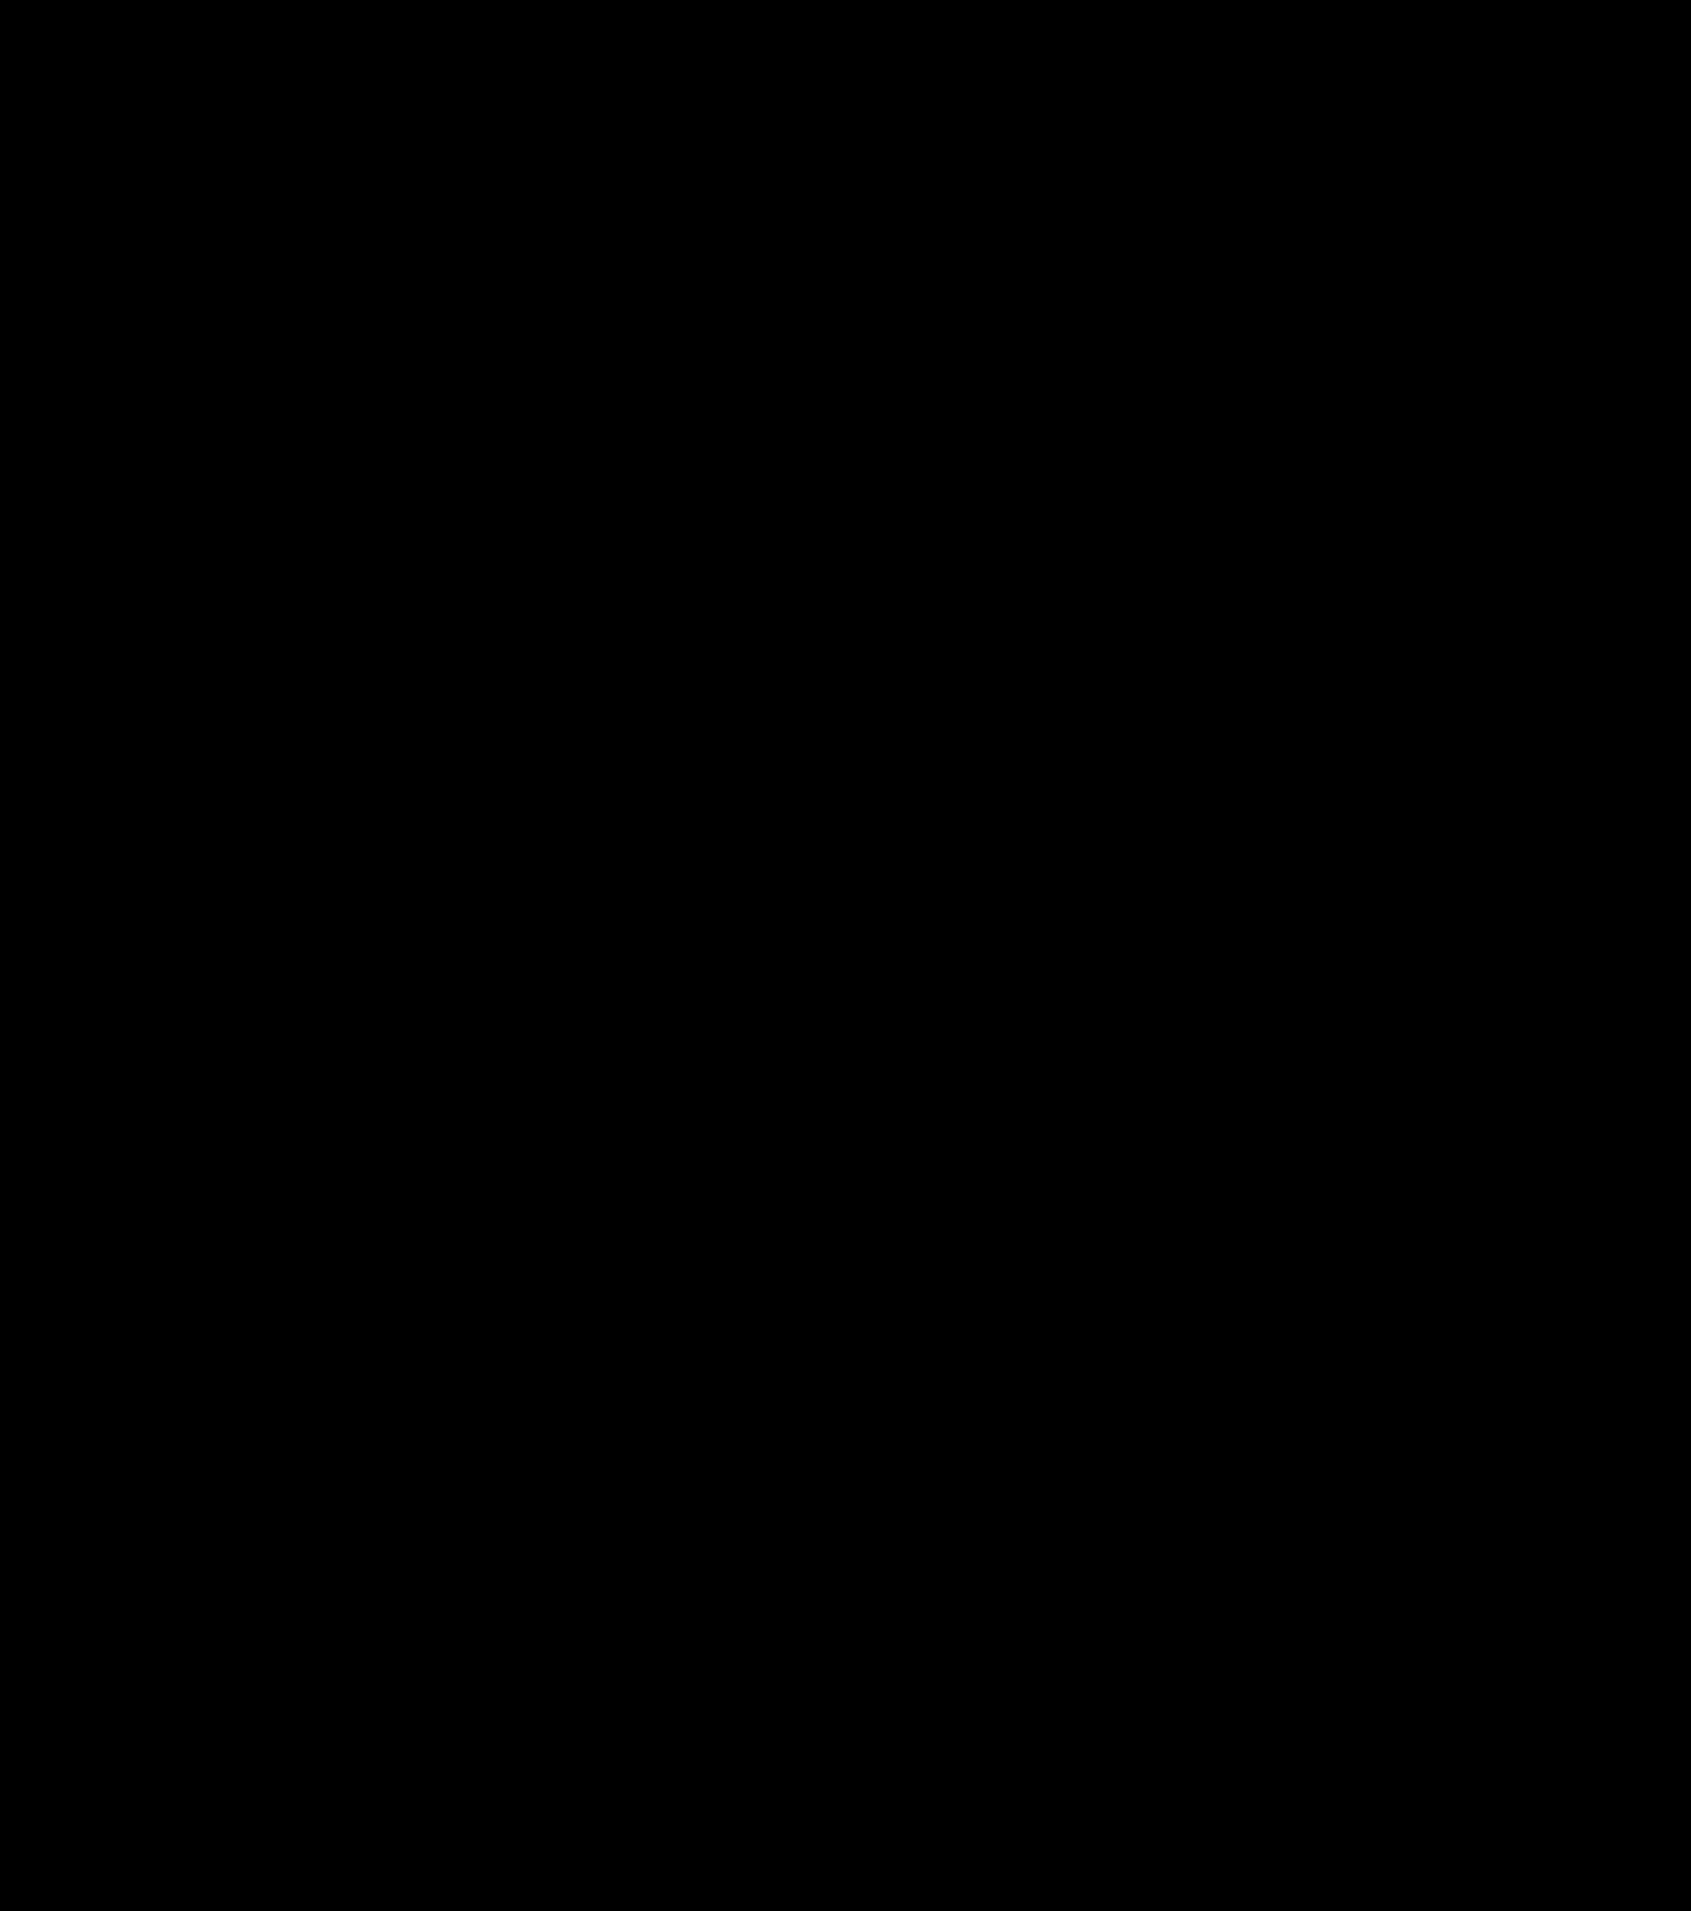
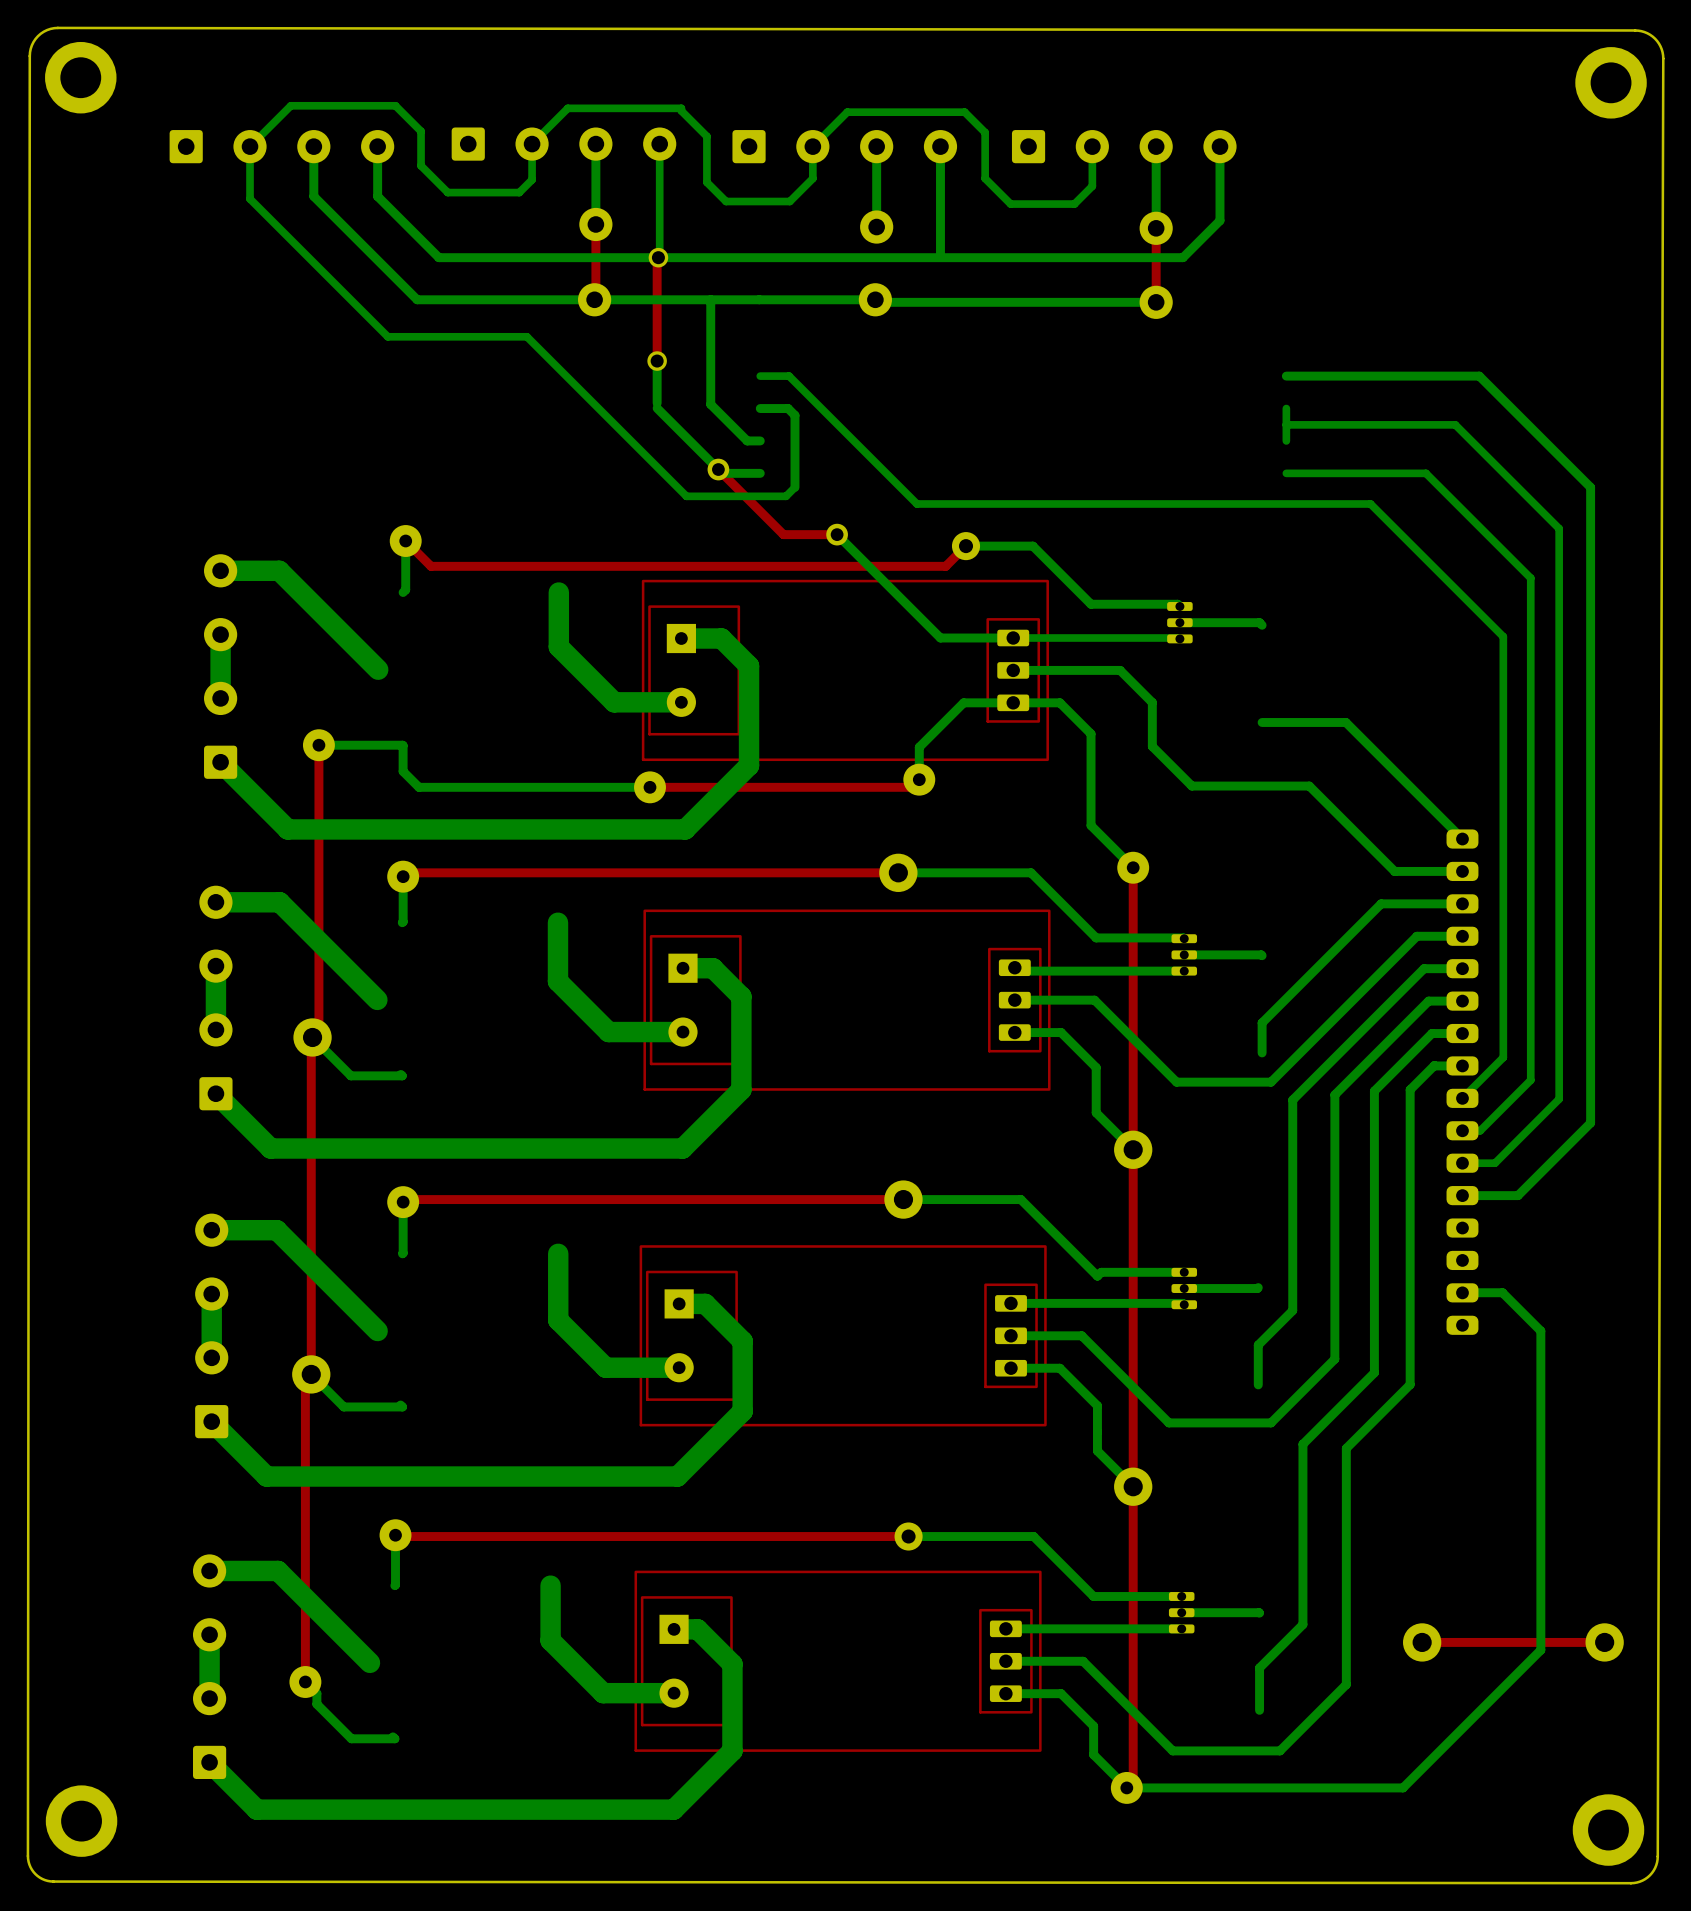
board edge: none -> (57, 27) (1635, 30) (1647, 33) (1657, 41) (1661, 49) (1663, 58) (1657, 1856) (1655, 1868) (1647, 1877) (1639, 1881) (1630, 1883) (53, 1881) (42, 1879) (33, 1871) (27, 1856) (29, 56) (31, 45) (38, 36) (47, 30) (57, 27)
part: none -> (80, 77)
part: none -> (1611, 82)
part: none -> (563, 144)
bottom track: none -> (595, 144) (595, 224)
bottom track: none -> (659, 144) (658, 257)
part: none -> (281, 146)
bottom track: none -> (313, 146) (313, 196) (417, 299) (875, 299) (877, 302) (1156, 302)
part: none -> (844, 146)
bottom track: none -> (876, 146) (876, 227)
bottom track: none -> (940, 146) (940, 256)
bottom track: none -> (1092, 146) (1092, 186) (1074, 204) (1010, 204) (985, 178) (985, 132) (964, 112) (847, 112) (812, 146) (812, 178) (789, 201) (726, 201) (706, 182) (706, 136) (681, 110) (681, 108) (567, 108) (532, 144) (532, 179) (519, 192) (447, 192) (421, 165) (421, 131) (395, 105) (290, 105) (250, 146) (250, 198) (387, 336) (526, 336) (686, 496) (786, 496) (794, 487) (794, 415) (788, 408) (760, 408)
part: none -> (1124, 146)
bottom track: none -> (1156, 146) (1156, 228)
bottom track: none -> (1219, 146) (1219, 220) (1182, 257) (438, 257) (377, 196) (377, 146)
top track: none -> (595, 224) (594, 299)
part: none -> (595, 224)
part: none -> (876, 227)
top track: none -> (1156, 228) (1156, 302)
part: none -> (1156, 228)
top track: none -> (658, 257) (657, 361)
part: none -> (658, 257)
part: none -> (594, 299)
bottom track: none -> (710, 299) (710, 404) (747, 440) (760, 440)
part: none -> (875, 299)
part: none -> (1156, 302)
bottom track: none -> (657, 361) (657, 403)
part: none -> (657, 361)
bottom track: none -> (760, 376) (789, 376) (916, 503) (1370, 503) (1503, 636) (1503, 1057) (1462, 1098)
bottom track: none -> (1286, 376) (1479, 376) (1590, 487) (1590, 1122) (1518, 1195) (1462, 1195)
bottom track: none -> (657, 408) (722, 473) (760, 473)
bottom track: none -> (1286, 408) (1286, 440)
bottom track: none -> (1286, 424) (1455, 424) (1559, 528) (1559, 1099) (1495, 1163) (1462, 1163)
top track: none -> (718, 469) (783, 534) (837, 534)
part: none -> (718, 469)
bottom track: none -> (1286, 473) (1425, 473) (1530, 578) (1530, 1080) (1480, 1130) (1462, 1130)
bottom track: none -> (837, 534) (940, 638) (1179, 638)
part: none -> (837, 534)
top track: none -> (405, 541) (431, 566) (945, 566) (966, 546)
bottom track: none -> (405, 541) (405, 589) (403, 592)
part: none -> (405, 541)
bottom track: none -> (966, 546) (1032, 546) (1091, 604) (1177, 604) (1179, 606)
part: none -> (966, 546)
bottom track: none -> (220, 570) (279, 570) (378, 669)
bottom track: none -> (558, 592) (558, 646) (614, 702) (681, 702)
bottom track: none -> (1179, 622) (1259, 622) (1262, 625)
part: none -> (1179, 622)
bottom track: none -> (220, 634) (220, 698)
bottom track: none -> (681, 638) (721, 638) (749, 665) (749, 765) (685, 829) (287, 829) (220, 762)
part: none -> (220, 666)
part: none -> (845, 670)
bottom track: none -> (1013, 670) (1120, 670) (1152, 702) (1152, 746) (1191, 786) (1309, 786) (1394, 871)
bottom track: none -> (1262, 722) (1345, 722) (1462, 839)
bottom track: none -> (317, 743) (402, 745) (403, 771) (418, 787) (650, 787)
top track: none -> (318, 745) (318, 1031) (311, 1038) (311, 1374) (305, 1380) (305, 1682)
part: none -> (318, 745)
top track: none -> (919, 779) (911, 787) (650, 787)
bottom track: none -> (919, 779) (919, 747) (963, 702) (1059, 702) (1091, 733) (1091, 825) (1133, 867)
part: none -> (919, 779)
part: none -> (650, 787)
top track: none -> (1133, 867) (1133, 1781) (1126, 1787)
part: none -> (1133, 867)
bottom track: none -> (1462, 871) (1394, 871)
top track: none -> (898, 872) (406, 872) (403, 876)
bottom track: none -> (898, 872) (1031, 872) (1096, 937) (1184, 938)
part: none -> (898, 872)
bottom track: none -> (403, 876) (402, 922)
part: none -> (403, 876)
bottom track: none -> (215, 902) (279, 902) (377, 999)
bottom track: none -> (1462, 903) (1381, 903) (1262, 1022) (1262, 1052)
bottom track: none -> (557, 922) (557, 981) (608, 1032) (682, 1032)
bottom track: none -> (1462, 936) (1416, 936) (1271, 1082) (1176, 1082) (1094, 1000) (1014, 1000)
bottom track: none -> (1184, 954) (1262, 955)
part: none -> (1184, 954)
bottom track: none -> (215, 966) (215, 1029)
bottom track: none -> (1014, 967) (1018, 971) (1184, 971)
bottom track: none -> (682, 968) (712, 968) (741, 996) (741, 1089) (682, 1148) (270, 1148) (215, 1093)
bottom track: none -> (1462, 968) (1424, 968) (1292, 1100) (1292, 1310) (1258, 1345) (1258, 1384)
part: none -> (215, 998)
part: none -> (846, 1000)
bottom track: none -> (1462, 1001) (1428, 1001) (1334, 1094) (1334, 1359) (1271, 1422) (1168, 1422) (1081, 1335) (1010, 1335)
bottom track: none -> (1014, 1032) (1061, 1032) (1096, 1067) (1096, 1112) (1133, 1149)
bottom track: none -> (1462, 1033) (1431, 1033) (1374, 1091) (1374, 1372) (1302, 1444) (1302, 1624) (1259, 1667) (1259, 1710)
bottom track: none -> (312, 1037) (350, 1075) (402, 1075) (400, 1074)
part: none -> (312, 1037)
bottom track: none -> (1462, 1065) (1434, 1065) (1410, 1089) (1410, 1384) (1346, 1448) (1346, 1684) (1279, 1750) (1172, 1750) (1083, 1661) (1005, 1661)
part: none -> (1462, 1082)
part: none -> (1133, 1149)
top track: none -> (903, 1199) (405, 1199) (403, 1202)
bottom track: none -> (903, 1199) (1020, 1199) (1097, 1276) (1101, 1272) (1184, 1272)
part: none -> (903, 1199)
bottom track: none -> (403, 1202) (402, 1253)
part: none -> (403, 1202)
bottom track: none -> (211, 1230) (276, 1230) (377, 1331)
bottom track: none -> (558, 1253) (558, 1320) (605, 1367) (679, 1367)
bottom track: none -> (1258, 1287) (1184, 1288)
part: none -> (1184, 1288)
bottom track: none -> (1462, 1292) (1502, 1292) (1540, 1331) (1540, 1650) (1403, 1787) (1126, 1787) (1093, 1754) (1093, 1726) (1061, 1693) (1005, 1693)
bottom track: none -> (211, 1294) (211, 1357)
bottom track: none -> (679, 1303) (705, 1303) (742, 1341) (742, 1411) (677, 1476) (266, 1476) (211, 1421)
bottom track: none -> (1010, 1303) (1184, 1304)
part: none -> (211, 1325)
part: none -> (843, 1335)
bottom track: none -> (1010, 1368) (1059, 1368) (1097, 1405) (1097, 1450) (1133, 1486)
bottom track: none -> (311, 1374) (343, 1406) (402, 1406) (400, 1405)
part: none -> (311, 1374)
part: none -> (1133, 1486)
top track: none -> (395, 1535) (908, 1536)
bottom track: none -> (395, 1535) (394, 1585)
part: none -> (395, 1535)
bottom track: none -> (908, 1536) (1033, 1536) (1093, 1596) (1181, 1596)
part: none -> (908, 1536)
bottom track: none -> (209, 1570) (278, 1570) (369, 1662)
bottom track: none -> (550, 1585) (550, 1640) (603, 1693) (674, 1693)
bottom track: none -> (1181, 1612) (1259, 1613)
part: none -> (1181, 1612)
bottom track: none -> (1181, 1628) (1005, 1628)
bottom track: none -> (674, 1629) (697, 1629) (732, 1664) (732, 1750) (673, 1809) (256, 1809) (209, 1762)
bottom track: none -> (209, 1634) (209, 1698)
part: none -> (1422, 1642)
top track: none -> (1604, 1642) (1422, 1642)
part: none -> (1604, 1642)
part: none -> (838, 1661)
part: none -> (209, 1666)
bottom track: none -> (305, 1682) (316, 1693) (316, 1704) (351, 1738) (394, 1738) (392, 1736)
part: none -> (305, 1682)
part: none -> (1126, 1787)
part: none -> (81, 1821)
part: none -> (1608, 1830)

